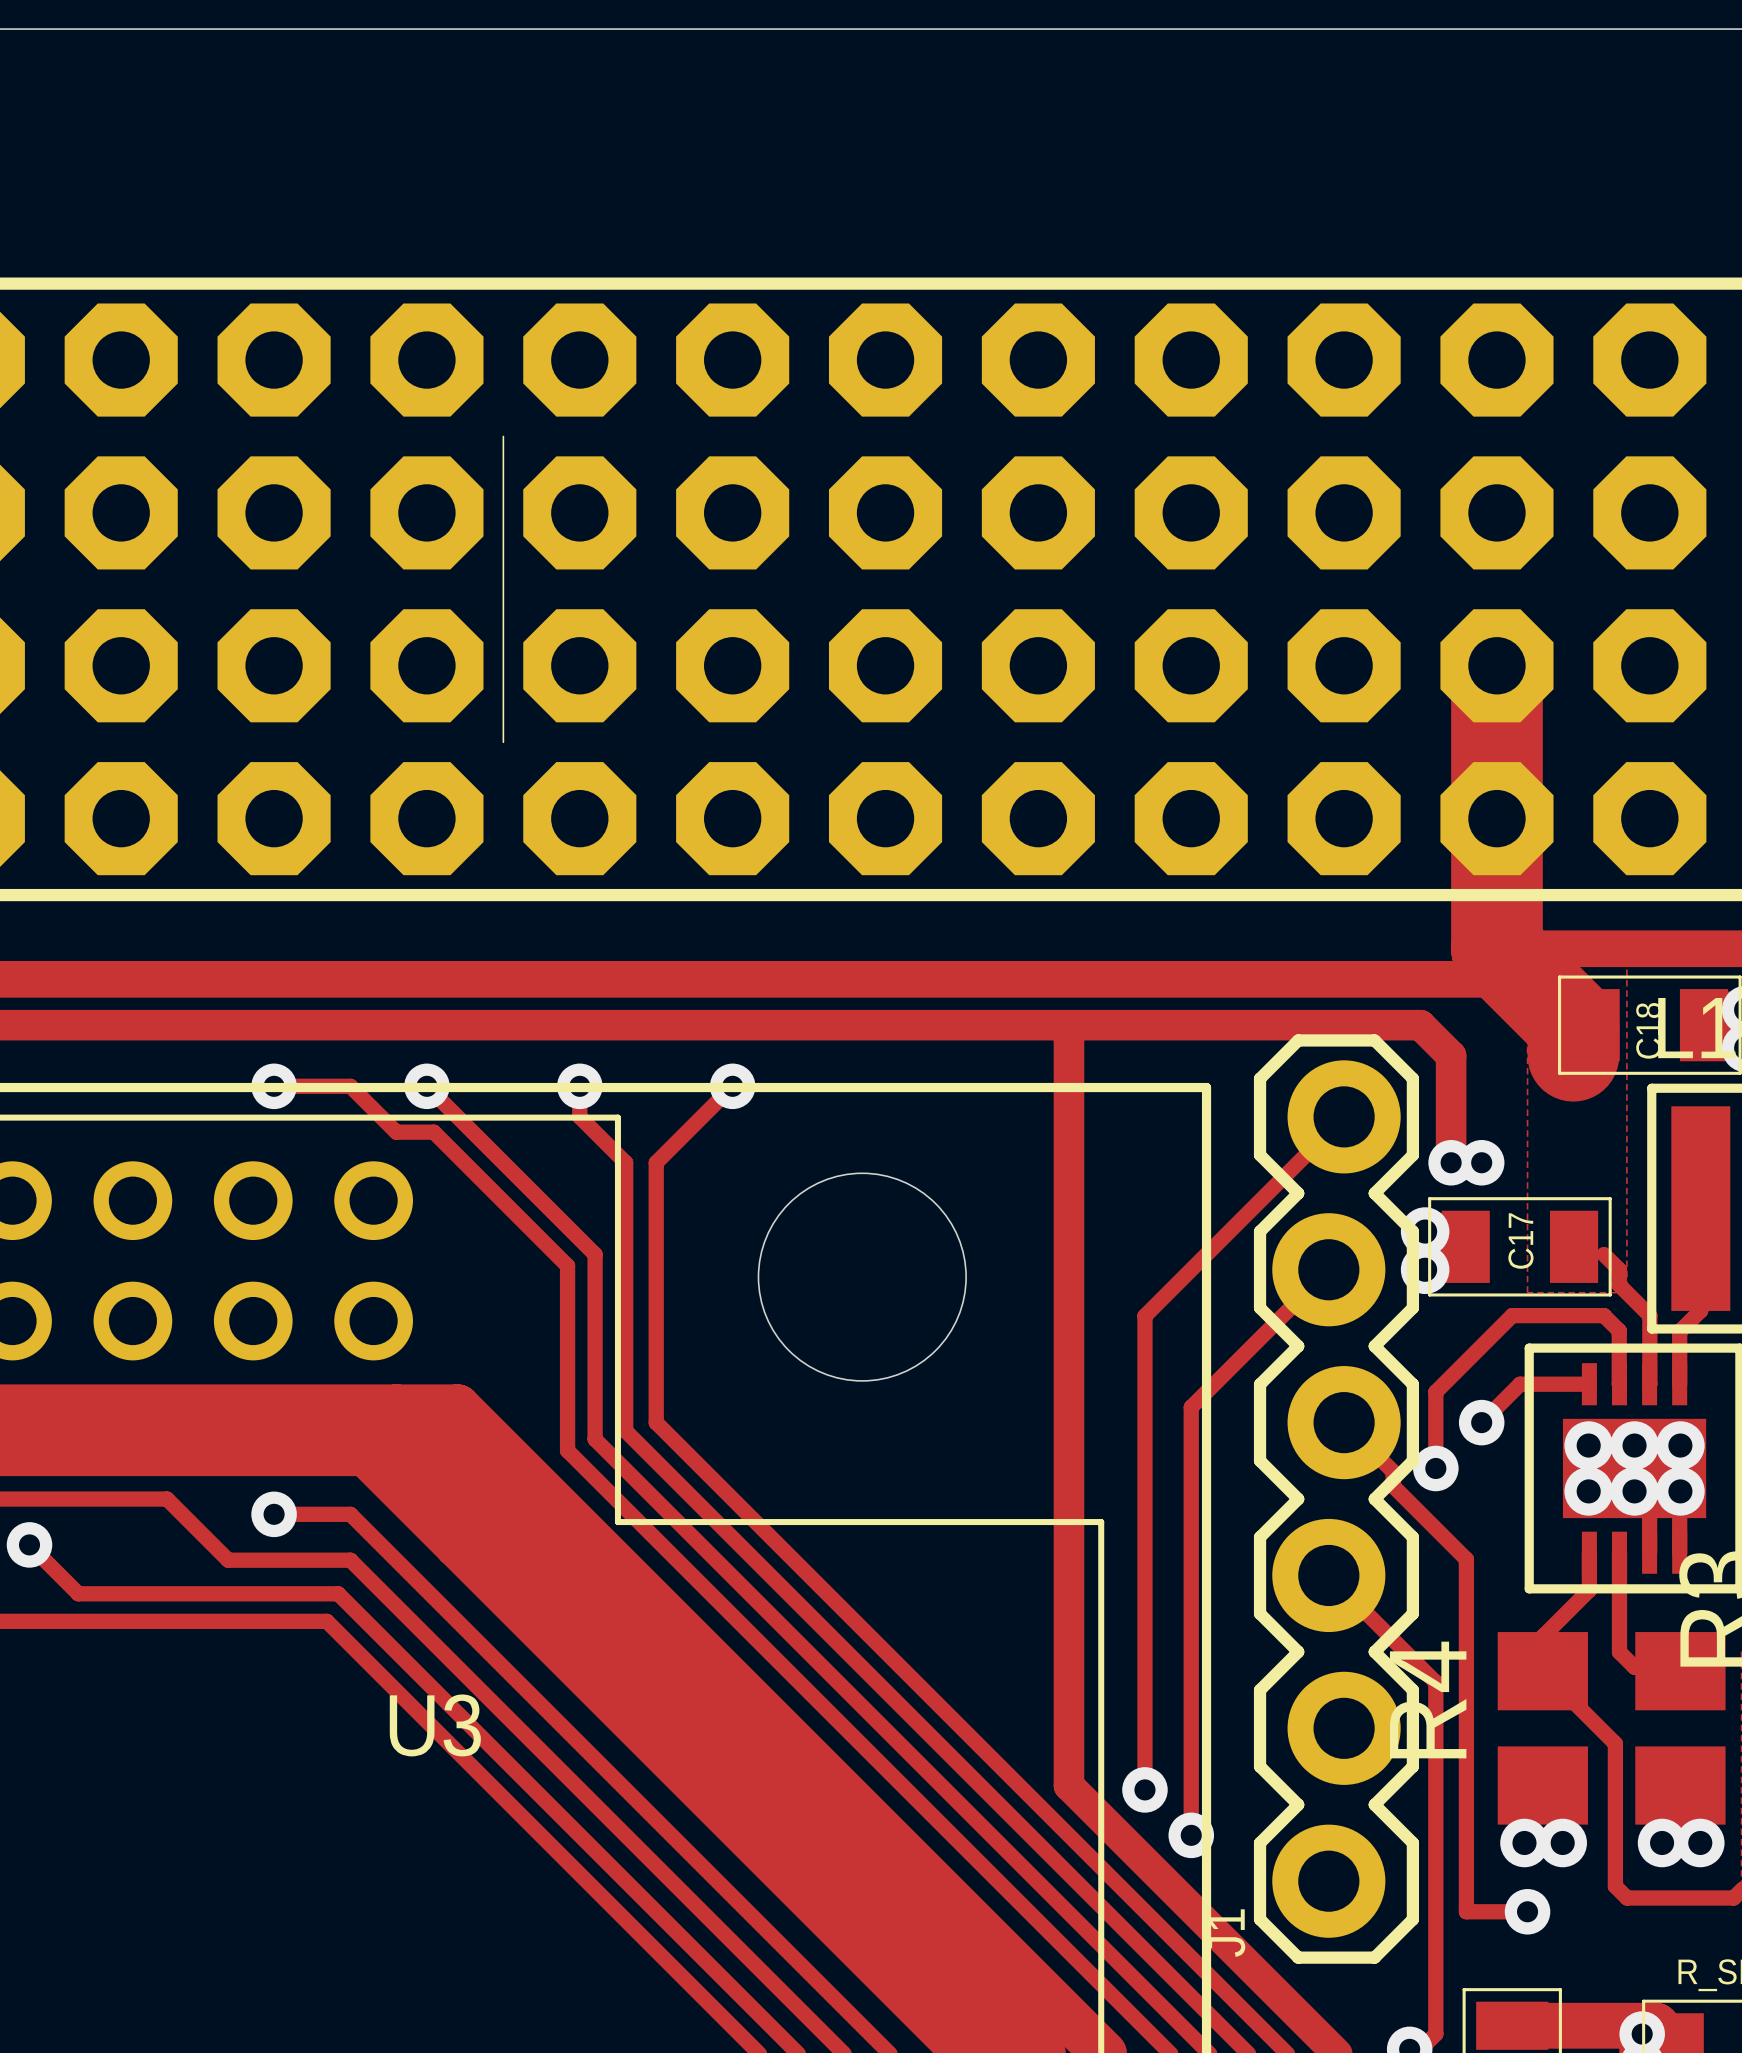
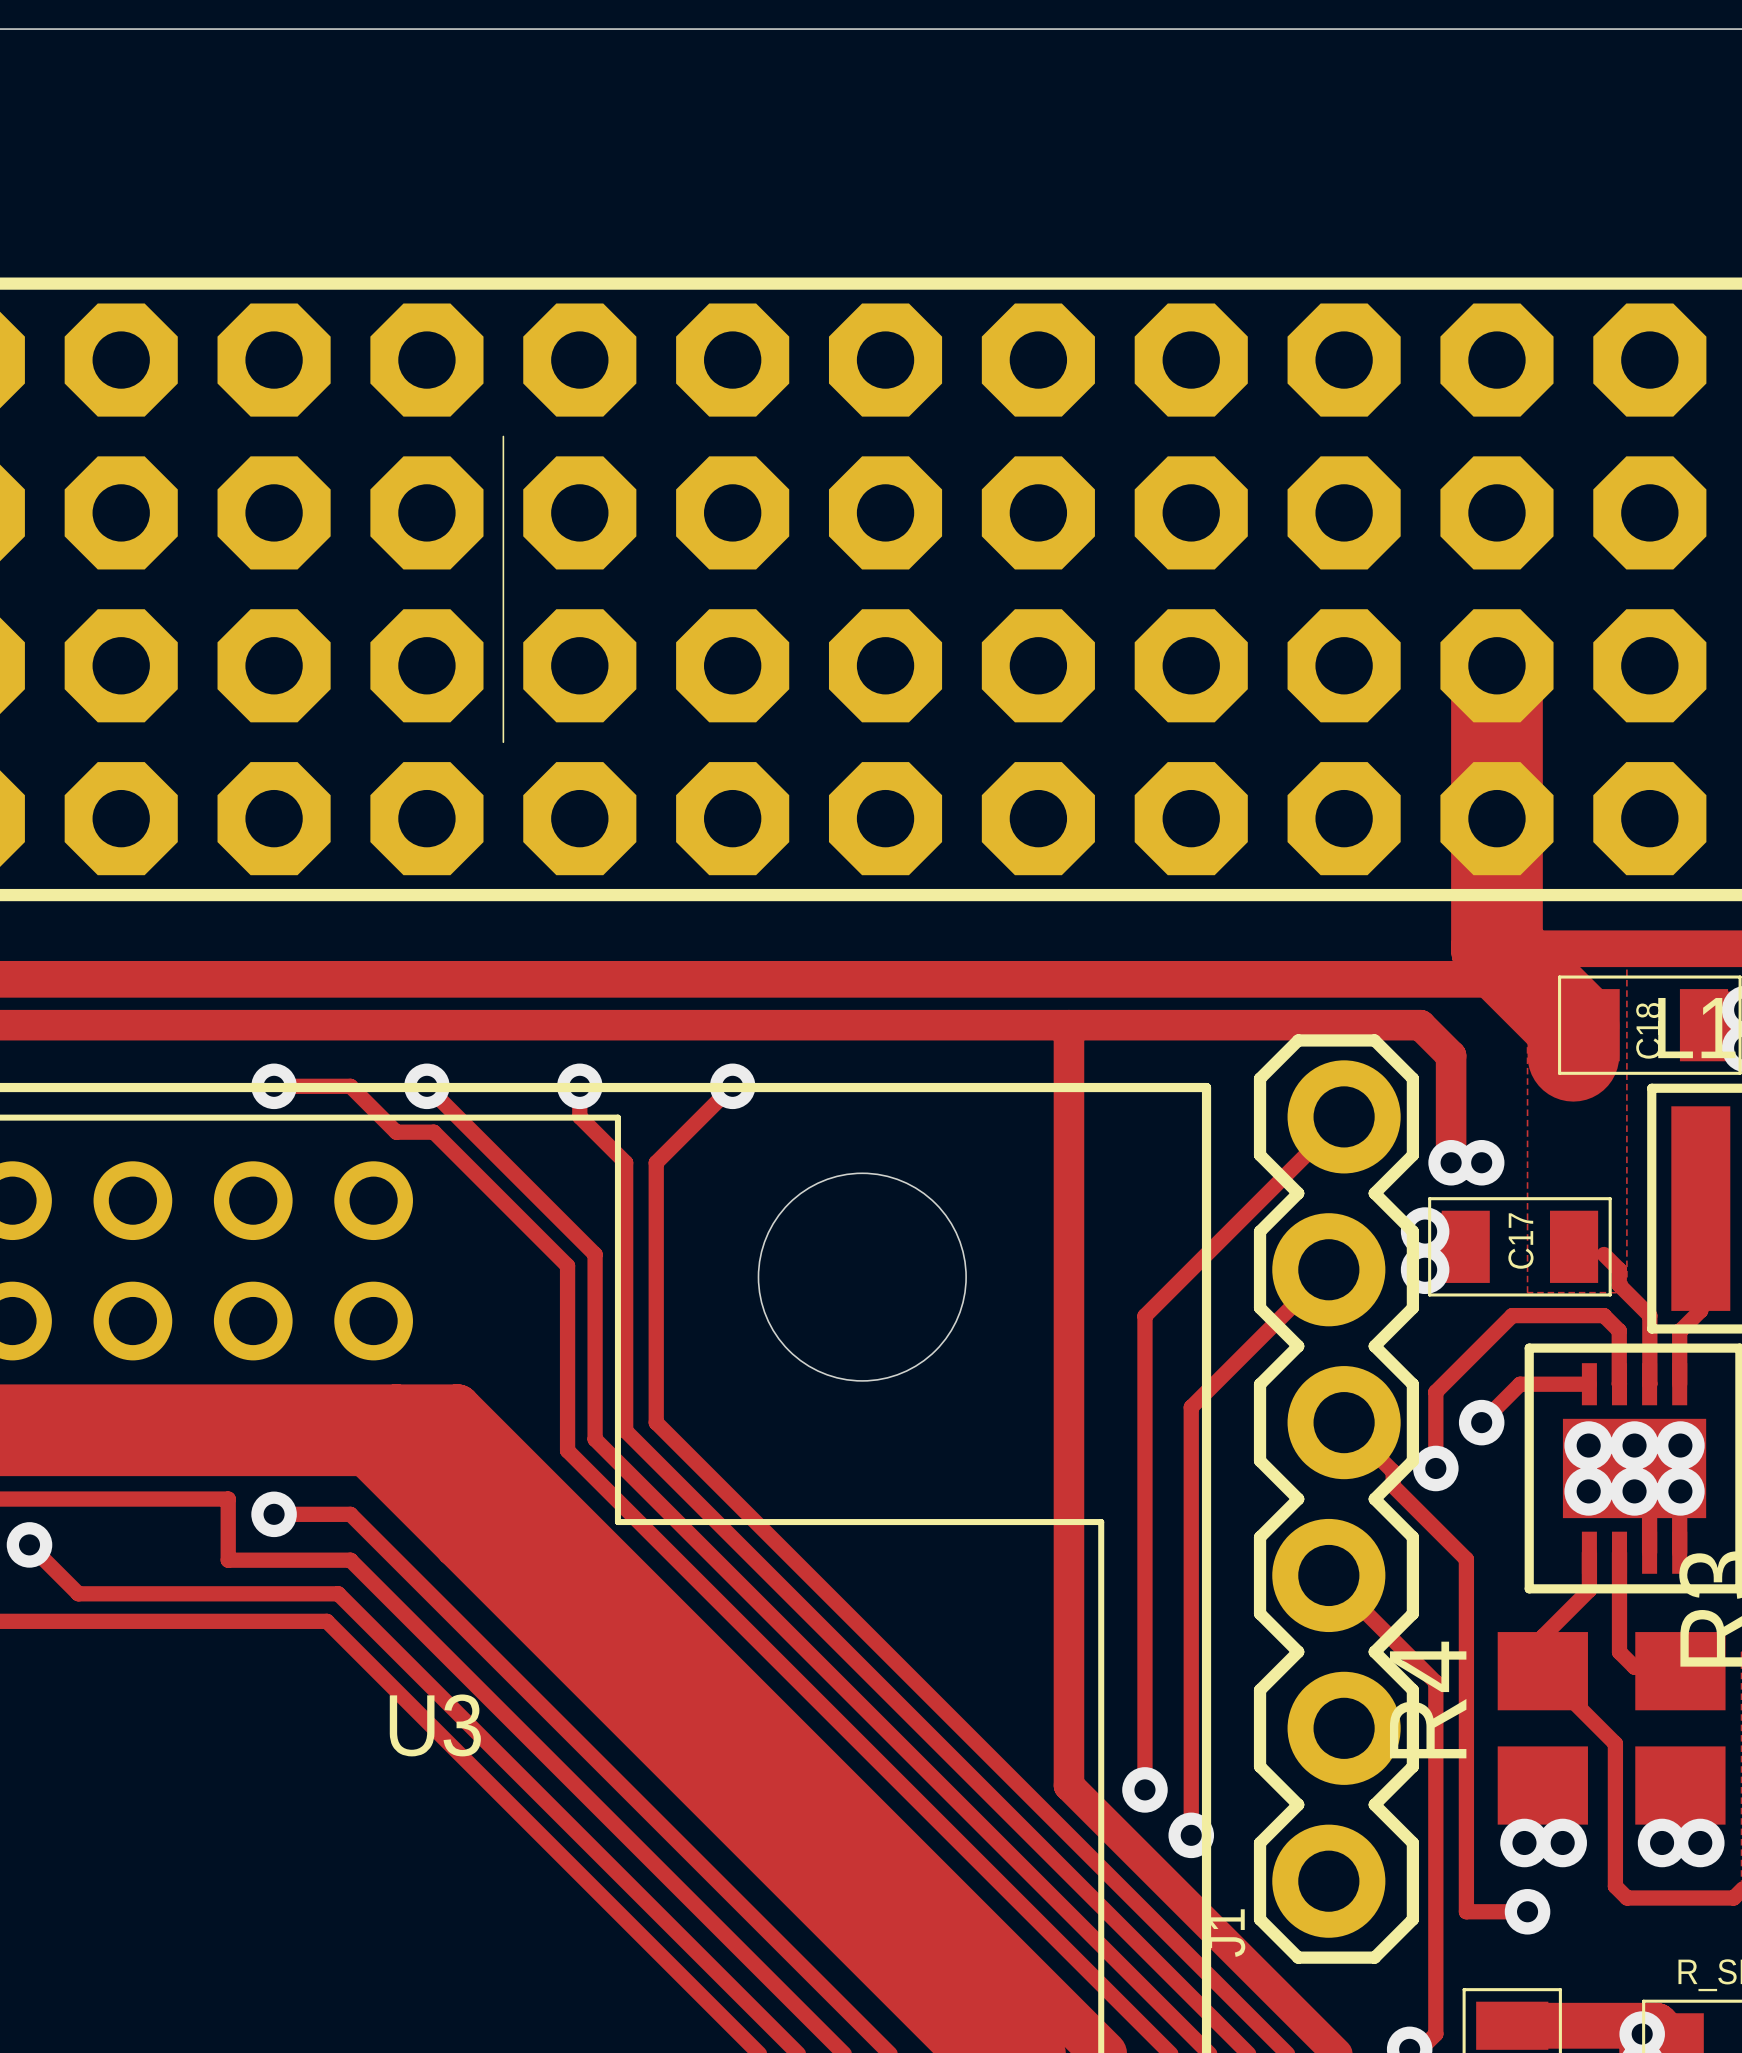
track: (167, 1499) (228, 1560) -> (167, 1499) (228, 1499) (228, 1560)

